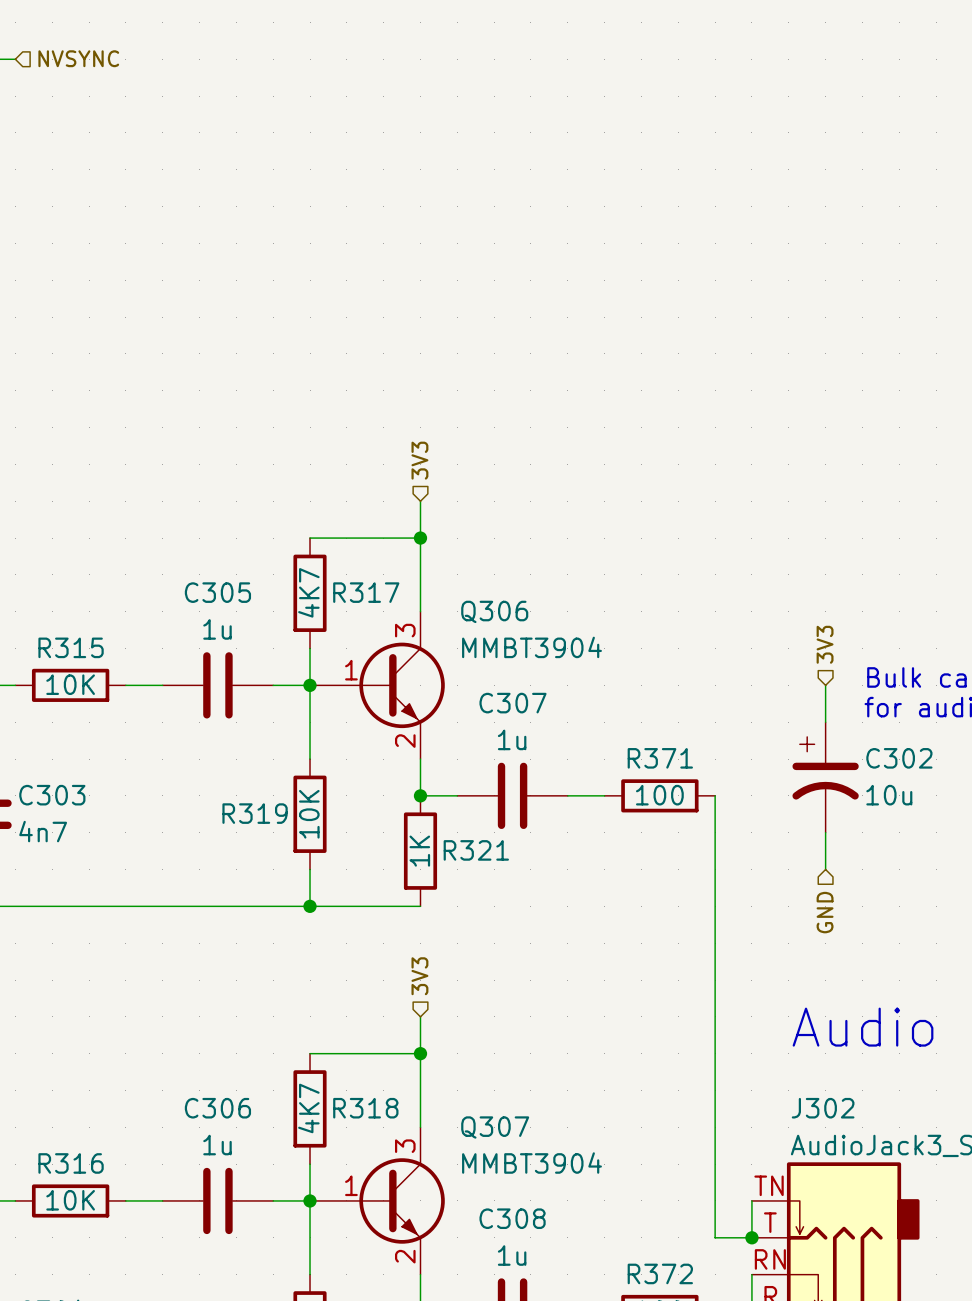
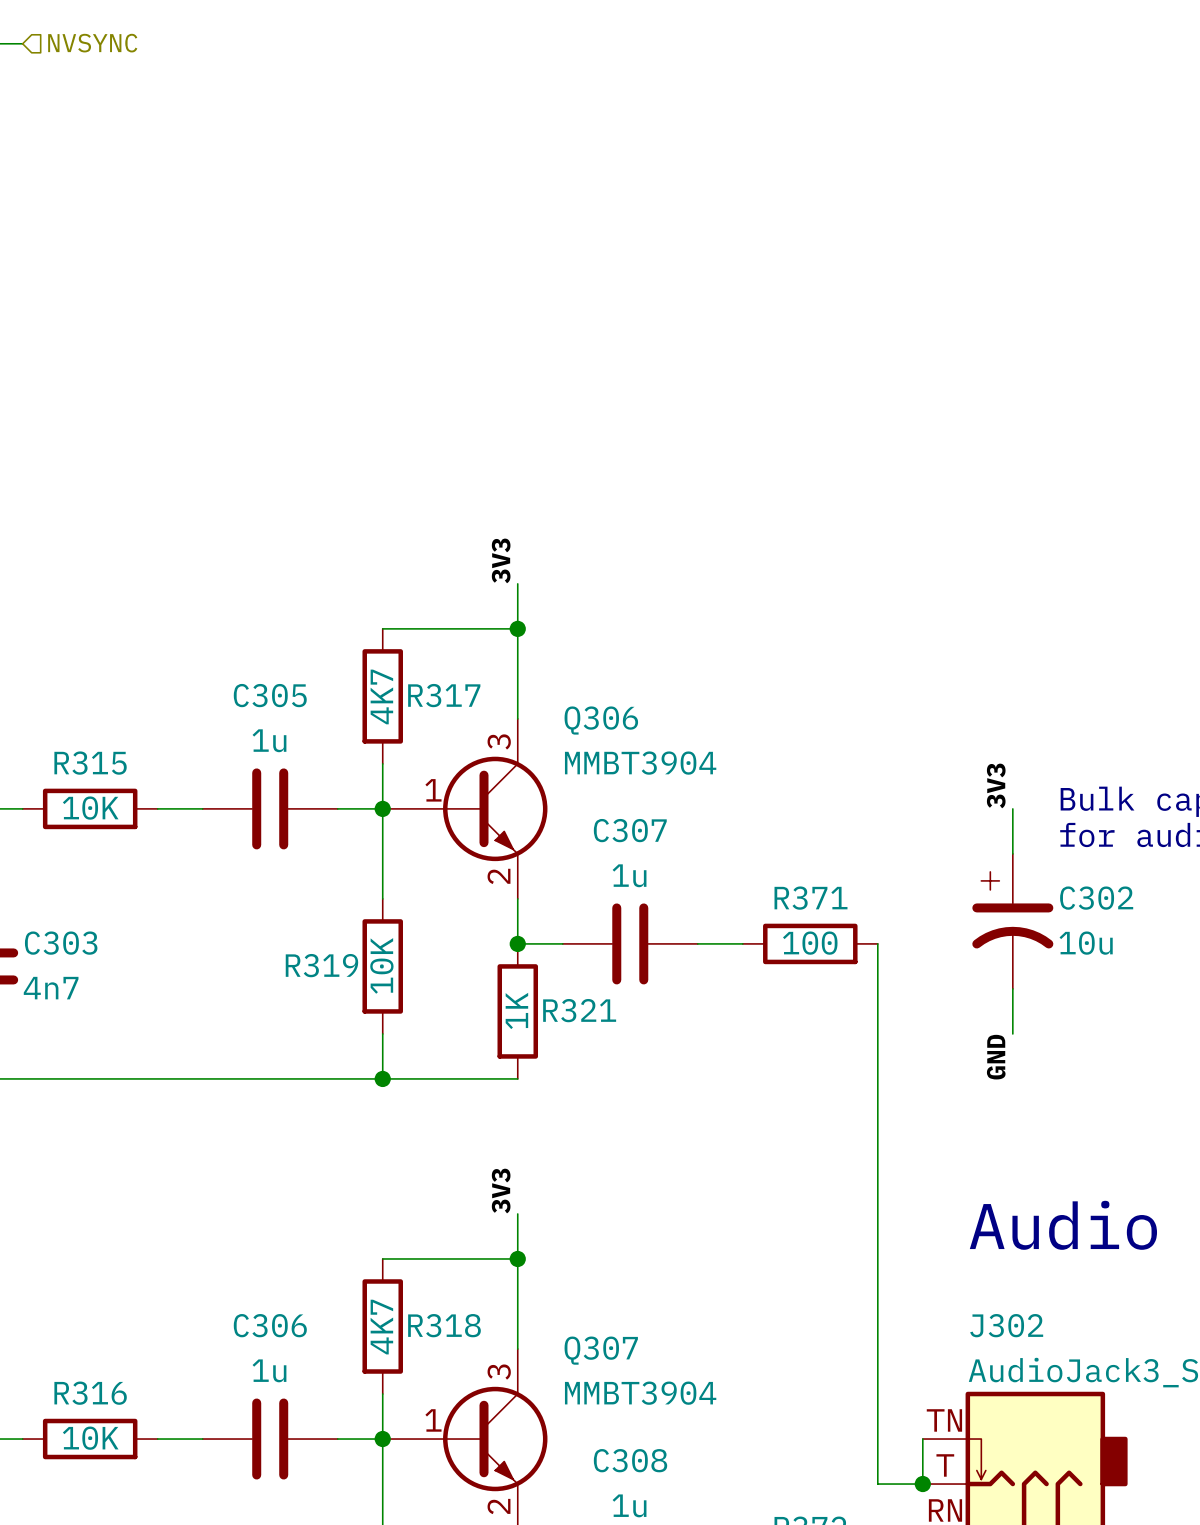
hierarchical label: 3V3 (419, 460) -> none
label: none -> 3V3 (501, 560)
hierarchical label: 3V3 (825, 644) -> none
label: none -> 3V3 (996, 785)
label: none -> GND (996, 1057)
hierarchical label: GND (825, 912) -> none
hierarchical label: 3V3 (419, 976) -> none
label: none -> 3V3 (501, 1191)

